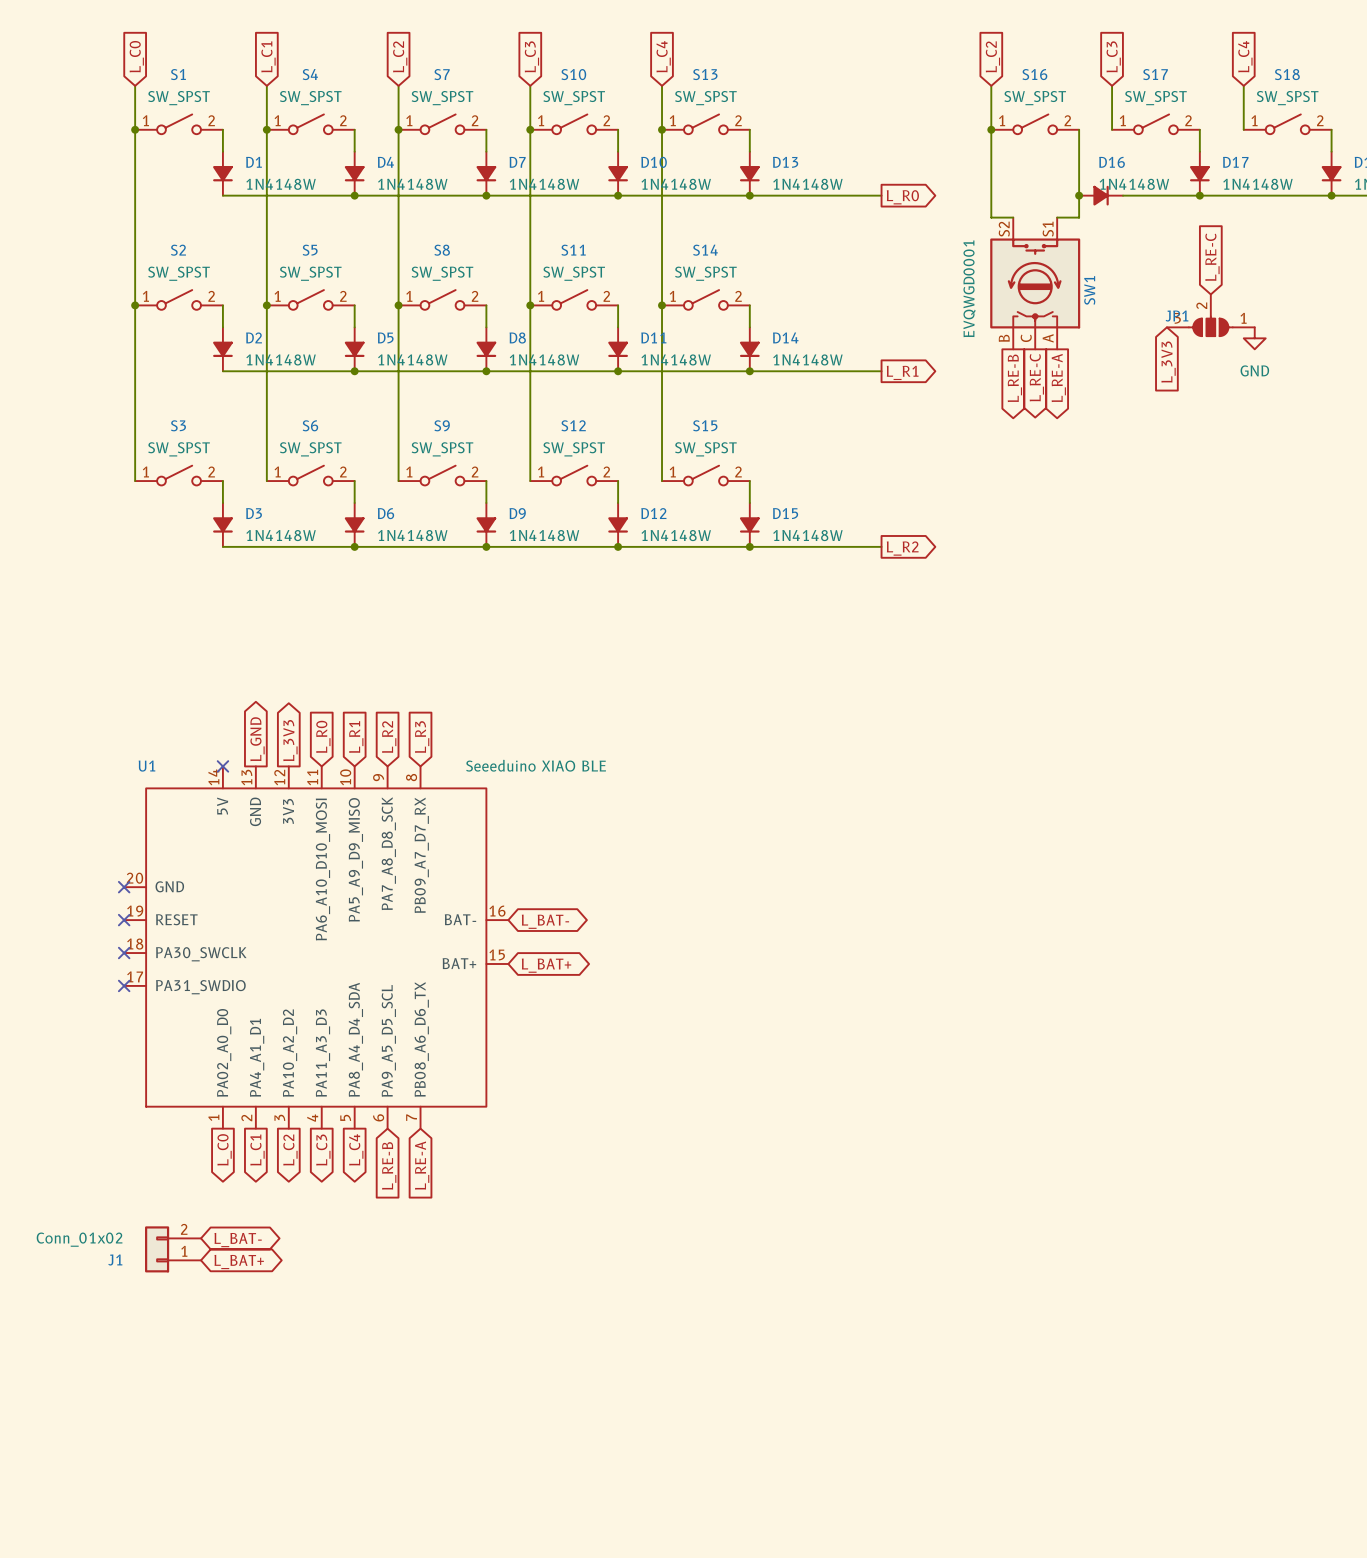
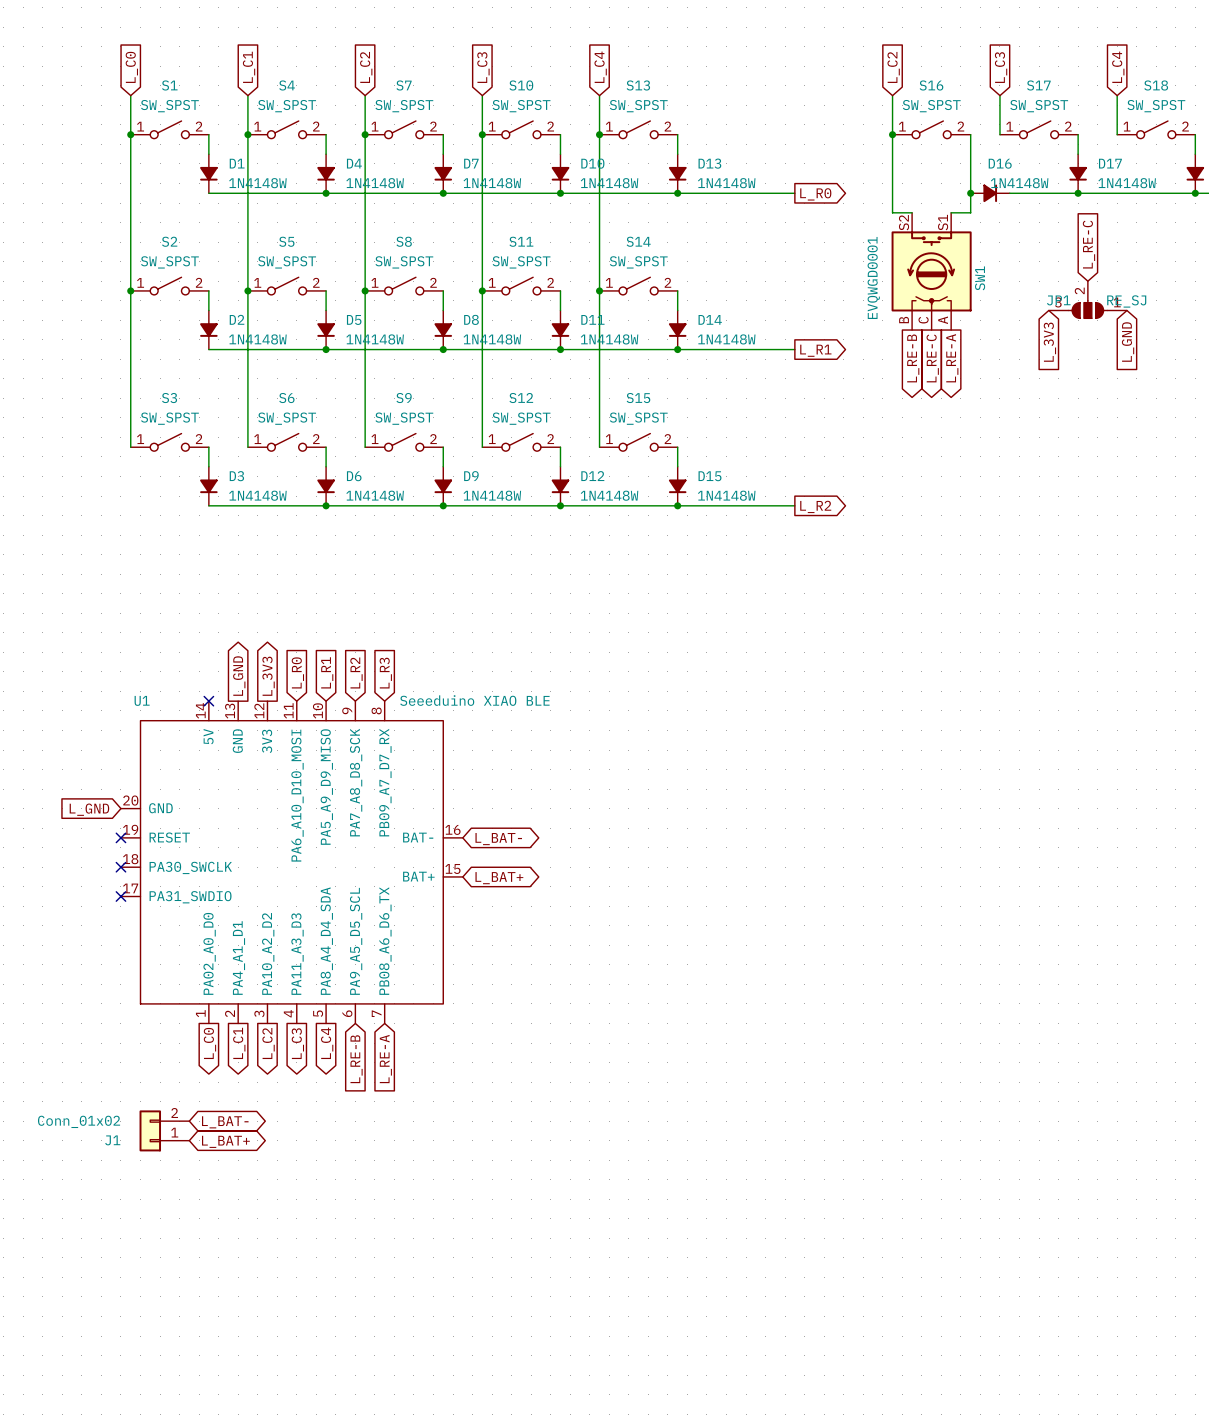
JP1 value: none -> RE_SJ (1126, 301)
power symbol: GND (1254, 338) -> none
global label: none -> L_GND (1128, 342)
no-connect mark: (124, 887) -> none
global label: none -> L_GND (89, 809)

